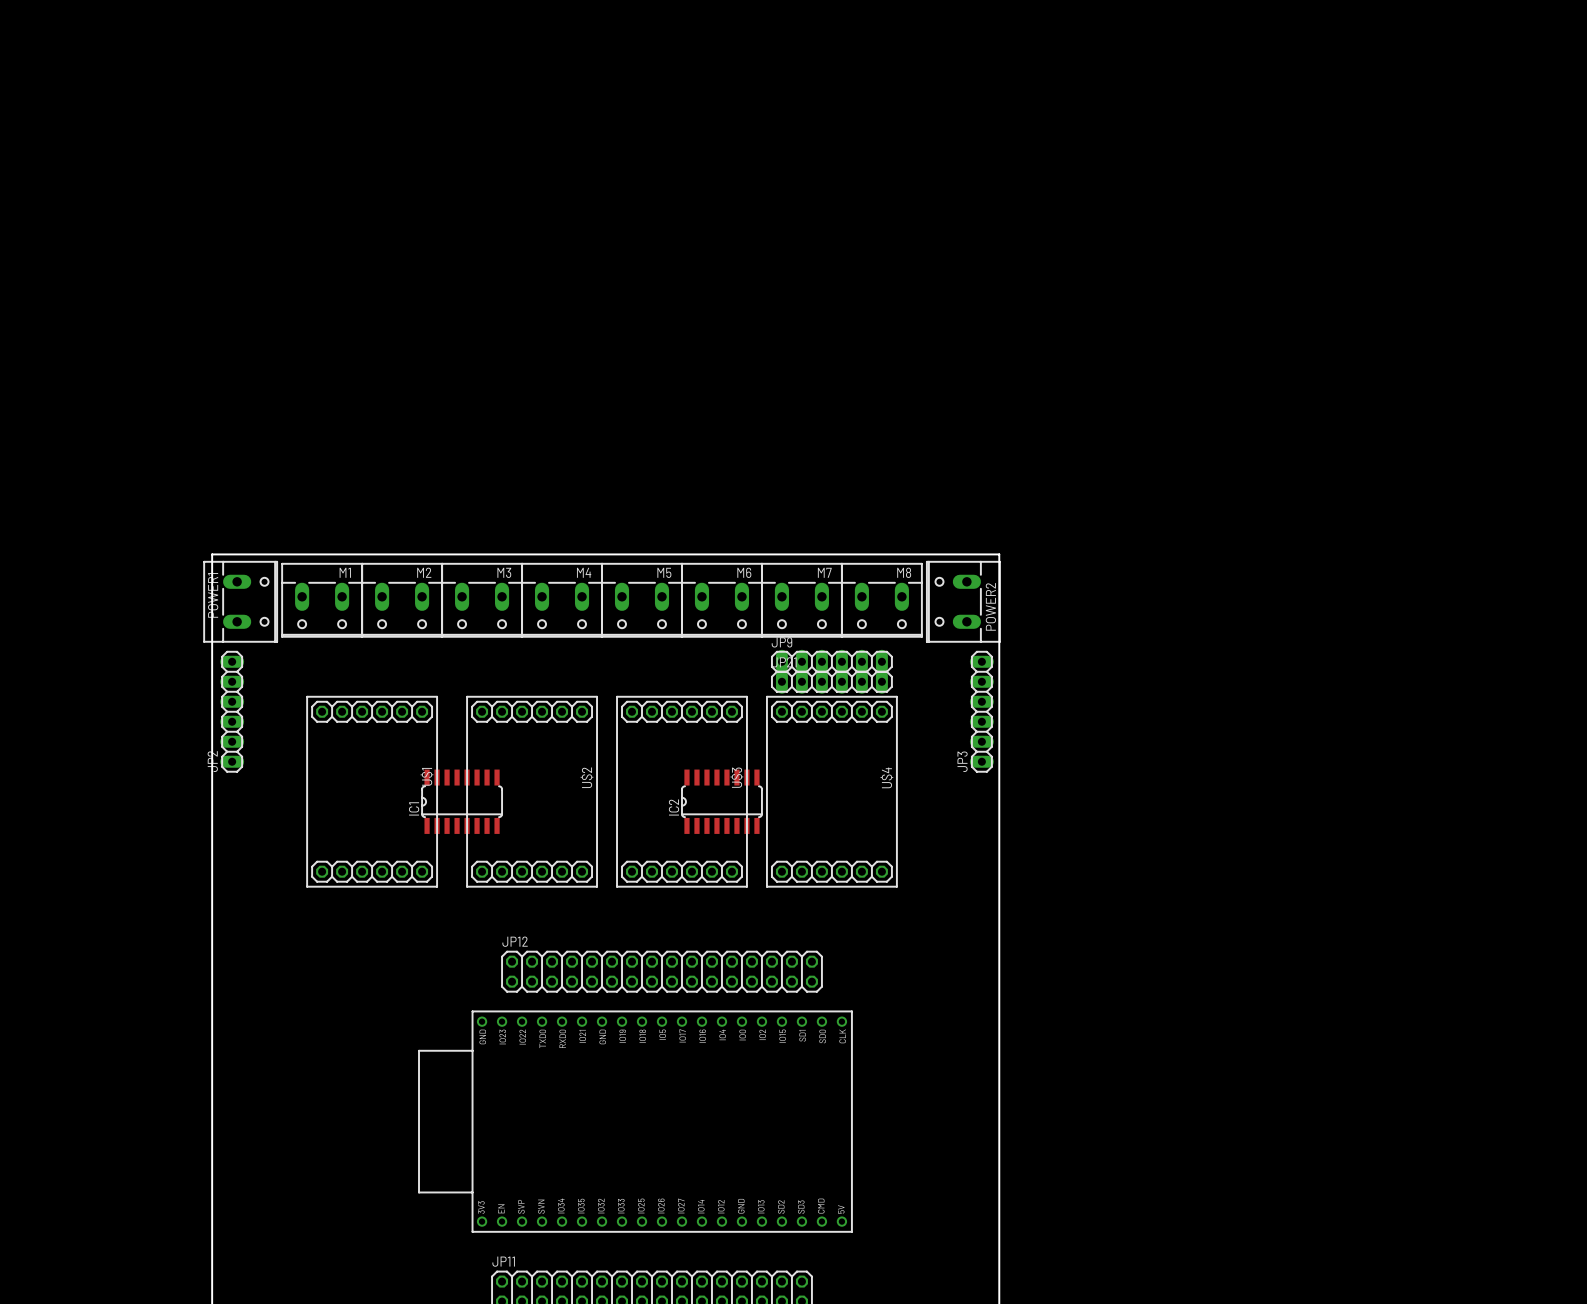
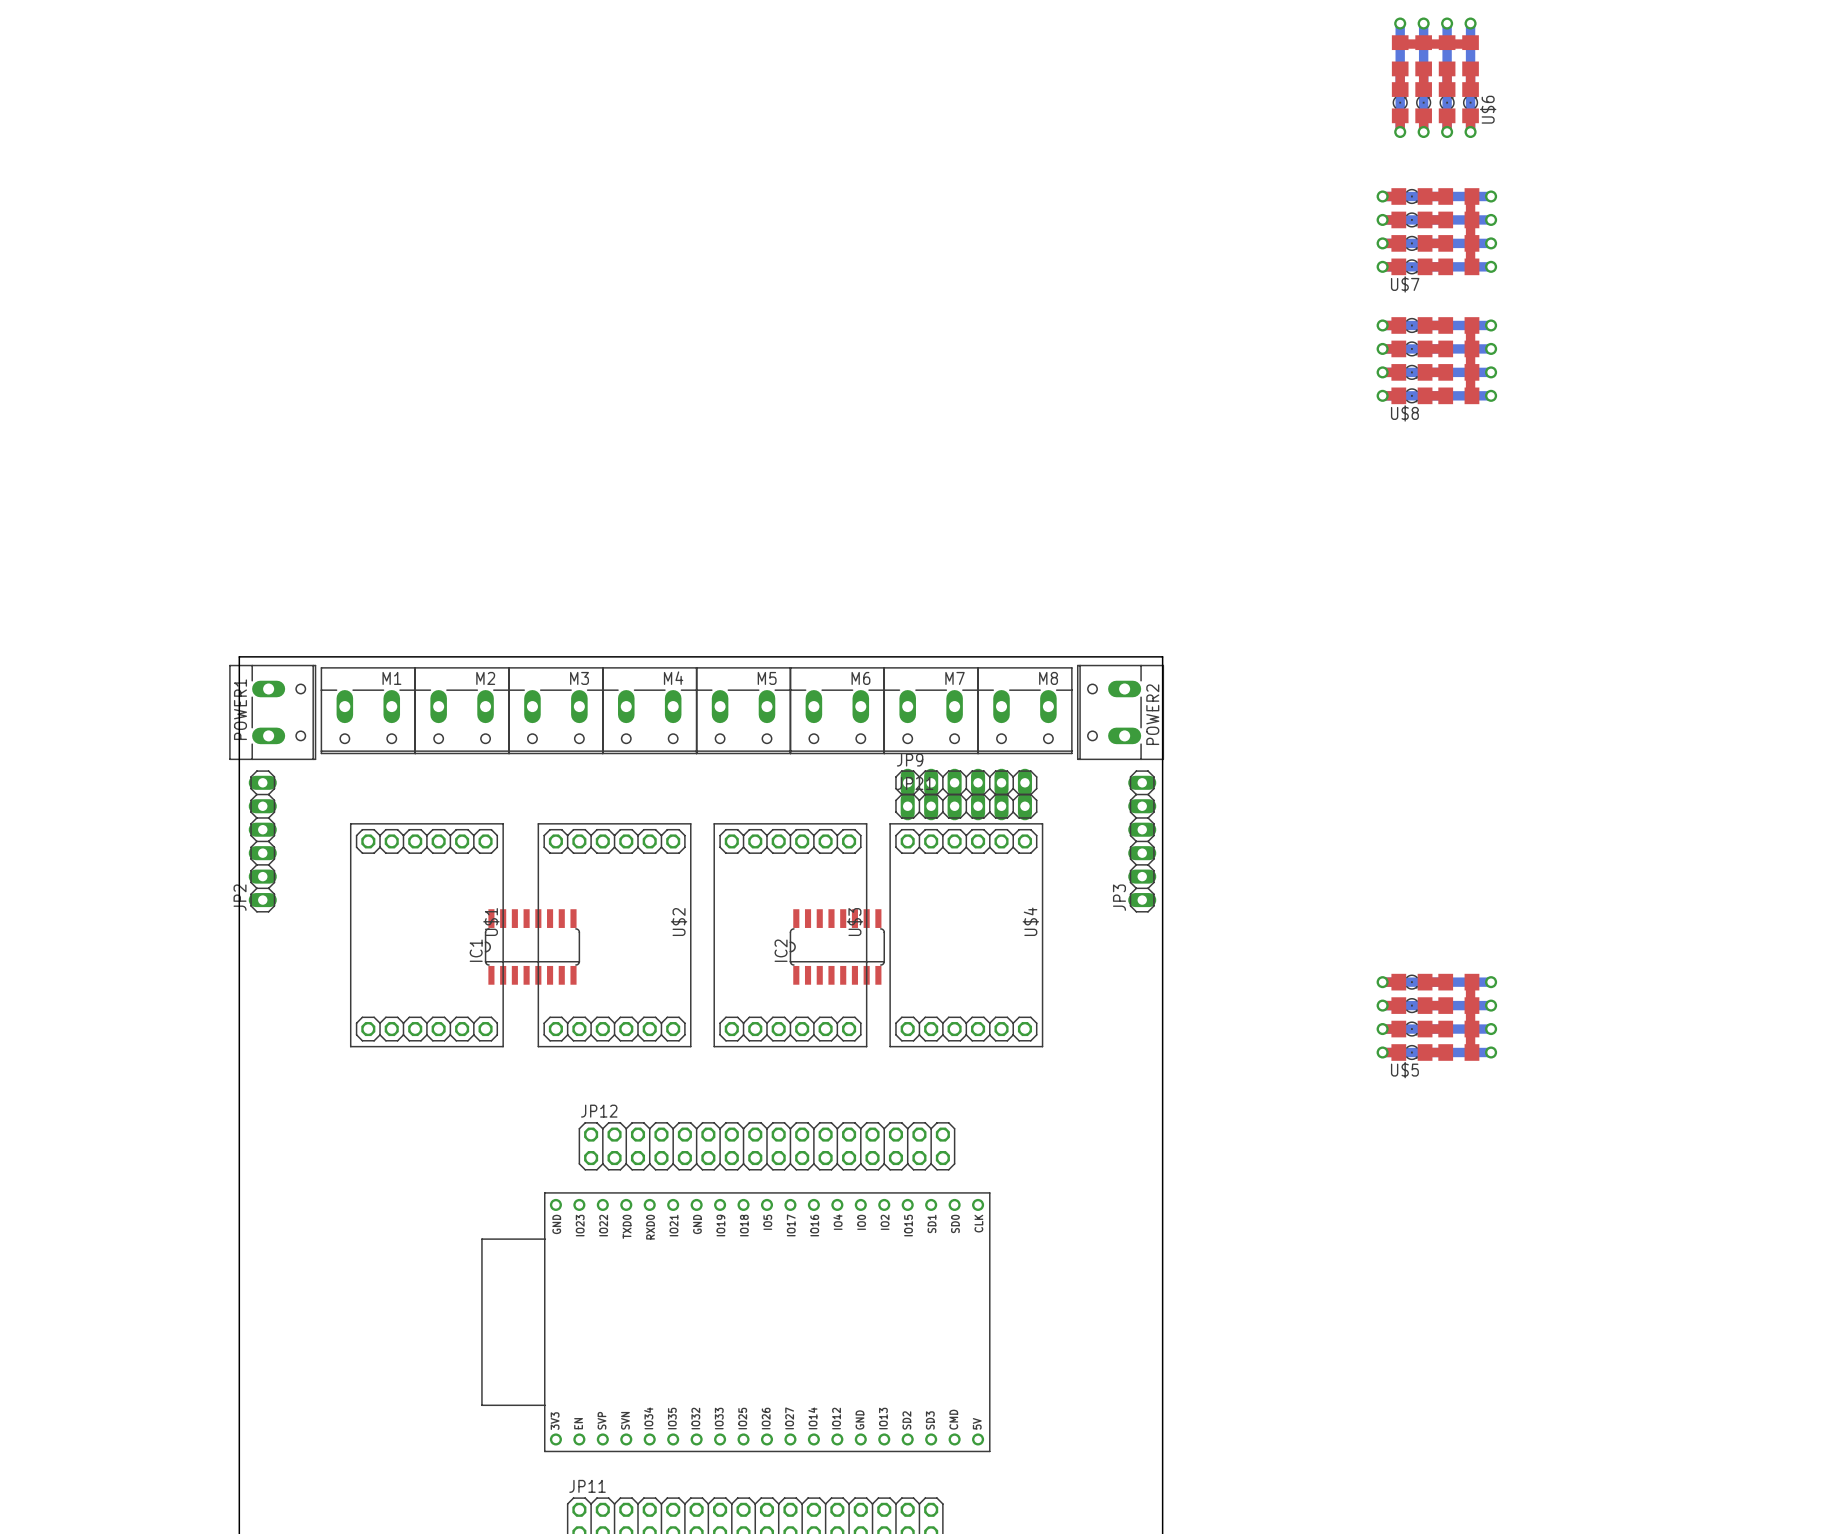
U$6: none -> (1435, 77)
U$7: none -> (1436, 231)
U$8: none -> (1436, 360)
U$5: none -> (1436, 1017)

